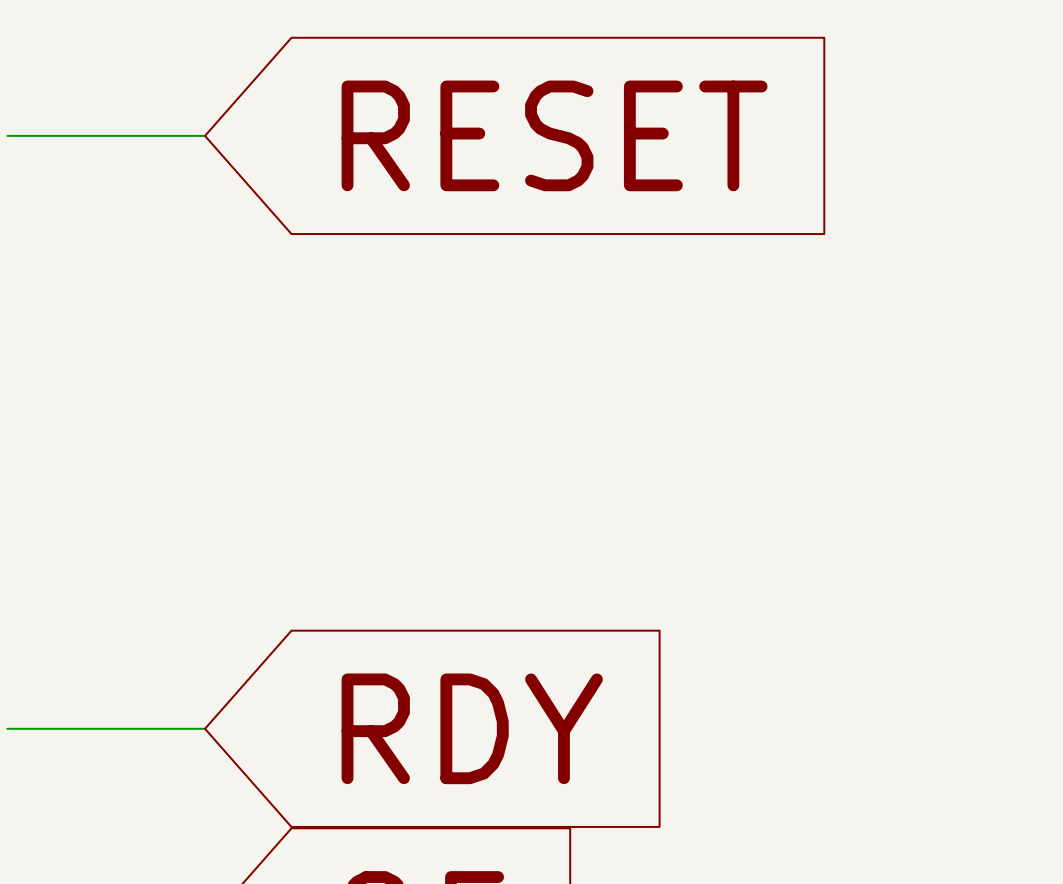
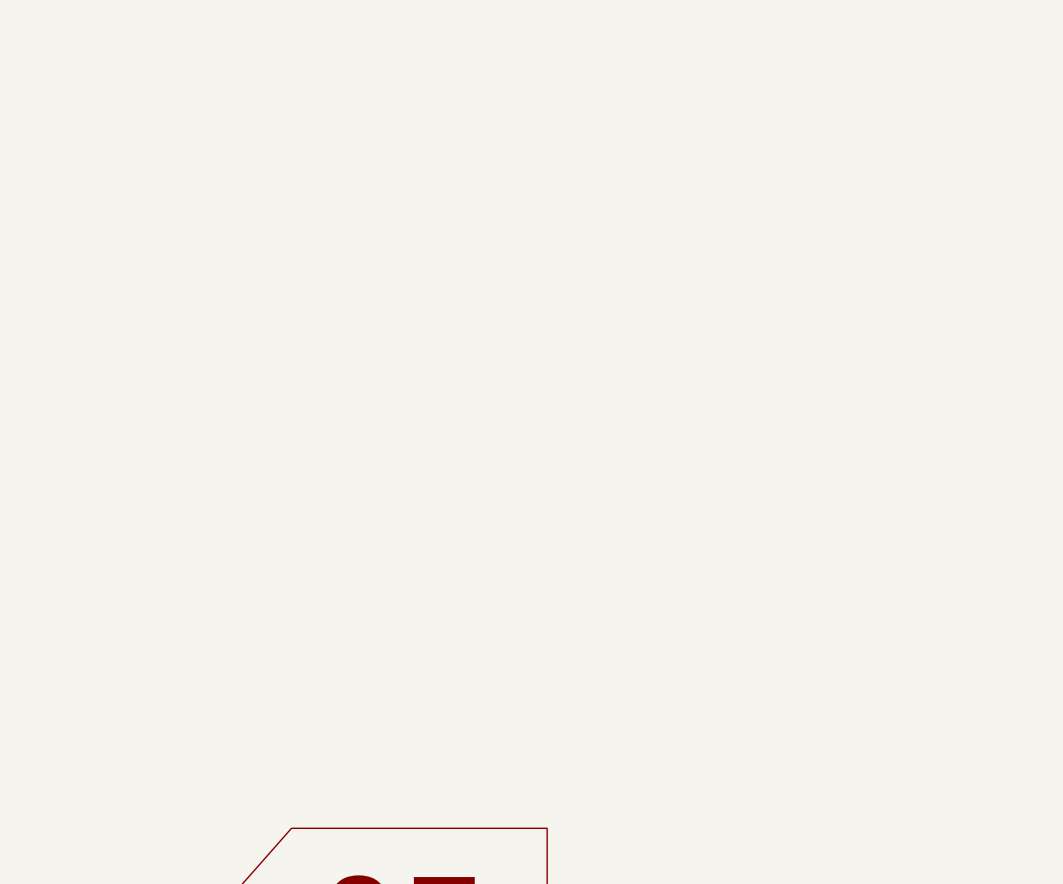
wire: (7, 135) (205, 135) -> none
global label: RESET (554, 135) -> none
wire: (7, 728) (205, 728) -> none
global label: RDY (472, 728) -> none

